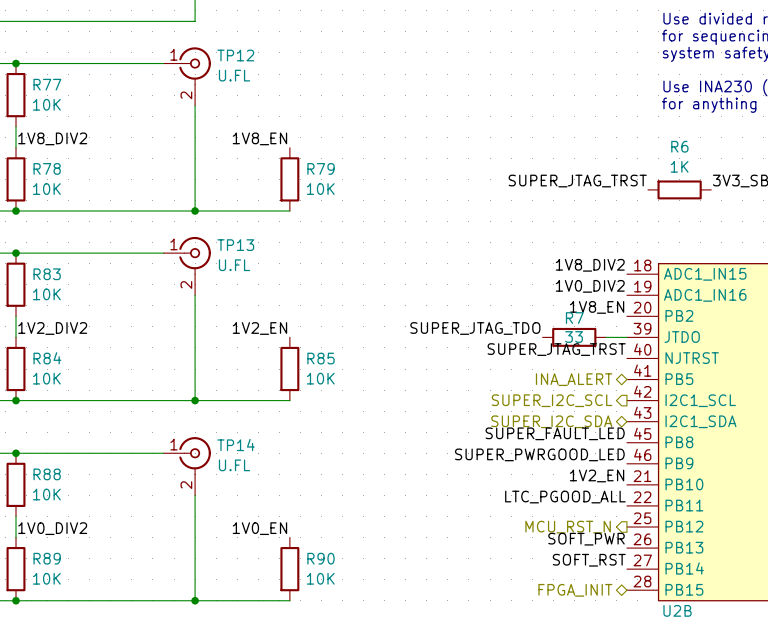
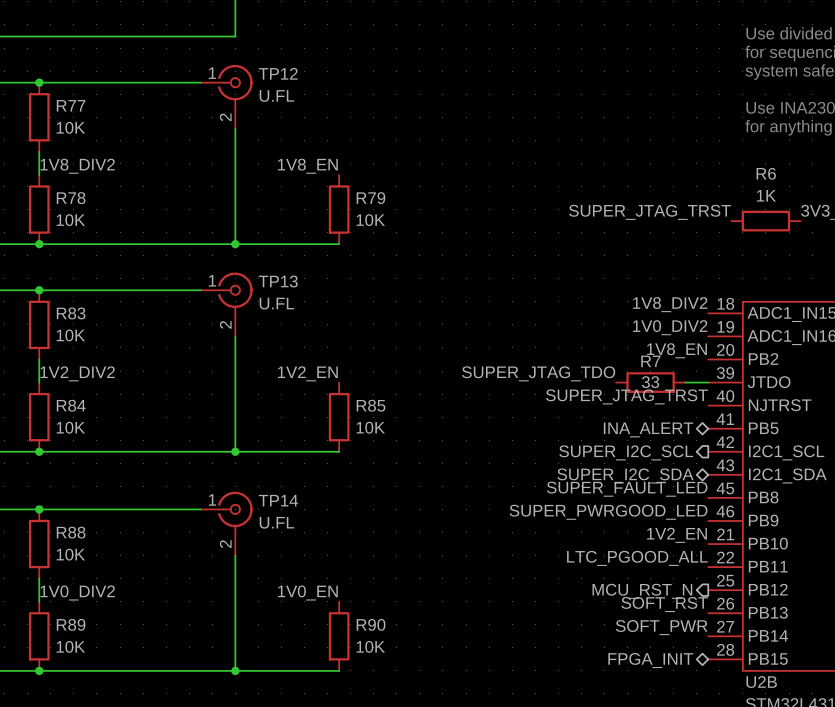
label: SOFT_PWR (586, 539) -> SOFT_RST (664, 604)
label: SOFT_RST (589, 560) -> SOFT_PWR (661, 627)

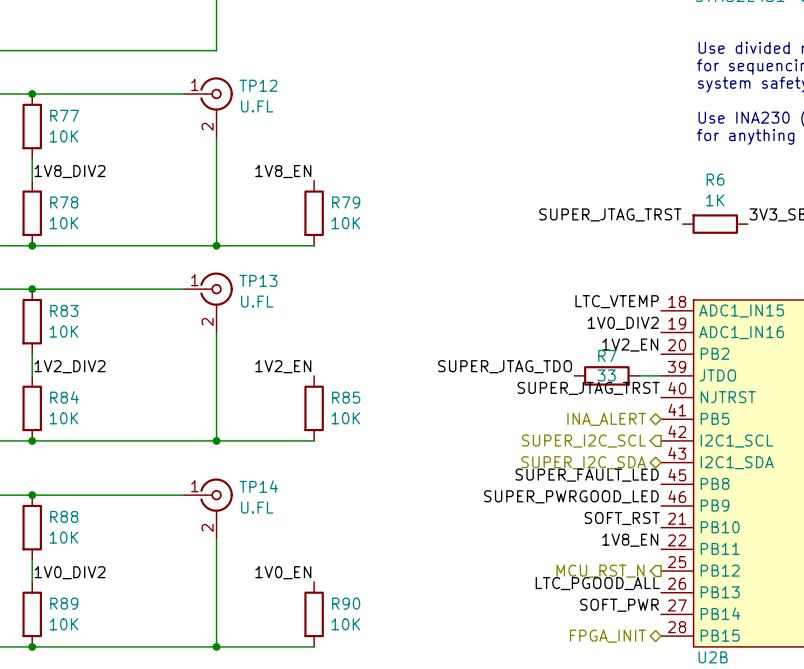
label: 1V8_DIV2 (670, 304) -> LTC_VTEMP (617, 301)
label: 1V8_EN (677, 350) -> 1V2_EN (630, 345)
label: 1V2_EN (677, 535) -> SOFT_RST (622, 518)
label: LTC_PGOOD_ALL (637, 558) -> 1V8_EN (630, 540)
label: SOFT_RST (664, 604) -> LTC_PGOOD_ALL (597, 583)

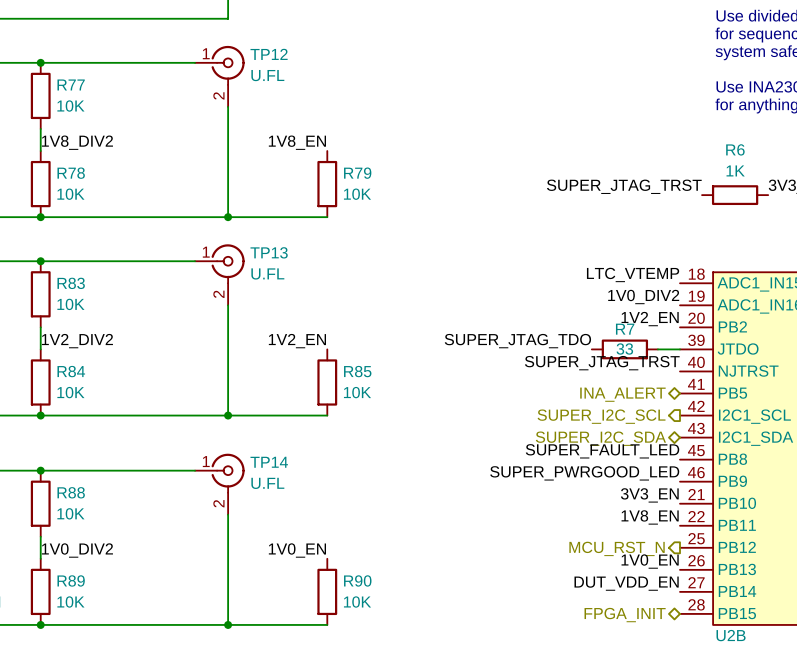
label: SOFT_RST (622, 518) -> 3V3_EN (649, 495)
label: LTC_PGOOD_ALL (597, 583) -> 1V0_EN (650, 561)
label: SOFT_PWR (619, 605) -> DUT_VDD_EN (626, 583)

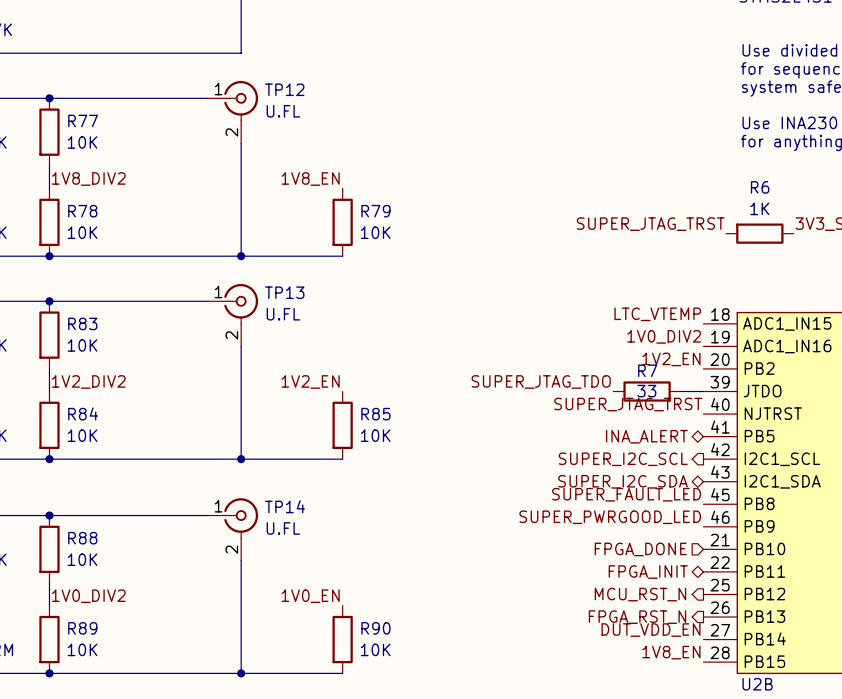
label: 3V3_EN (649, 495) -> none
hierarchical label: none -> FPGA_DONE (640, 549)
label position: 1V8_EN (650, 517) -> 1V8_EN (671, 652)
label: 1V0_EN (650, 561) -> none
hierarchical label: none -> FPGA_RST_N (637, 617)
hierarchical label position: FPGA_INIT (625, 615) -> FPGA_INIT (648, 572)

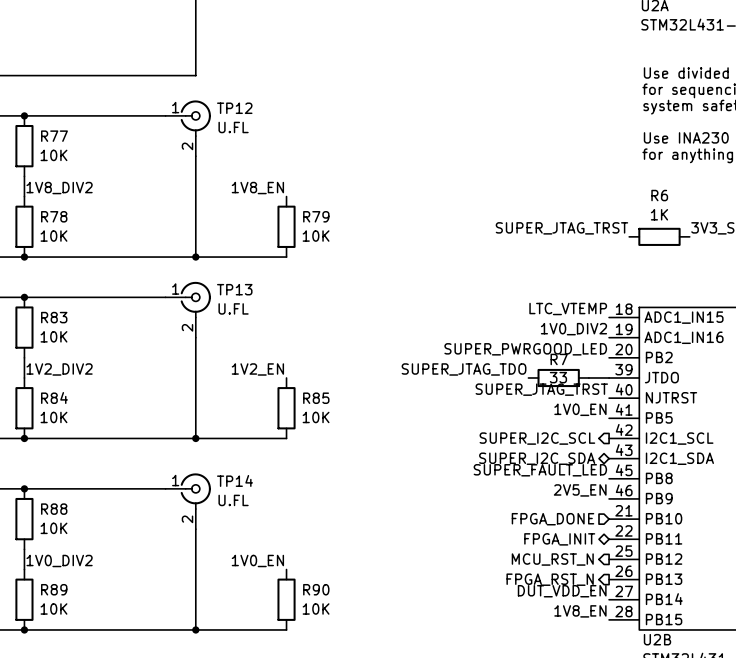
label: 1V2_EN (671, 359) -> SUPER_PWRGOOD_LED (525, 349)
label: none -> 1V0_EN (580, 409)
hierarchical label: INA_ALERT (646, 436) -> none
label: SUPER_PWRGOOD_LED (610, 517) -> 2V5_EN (580, 490)

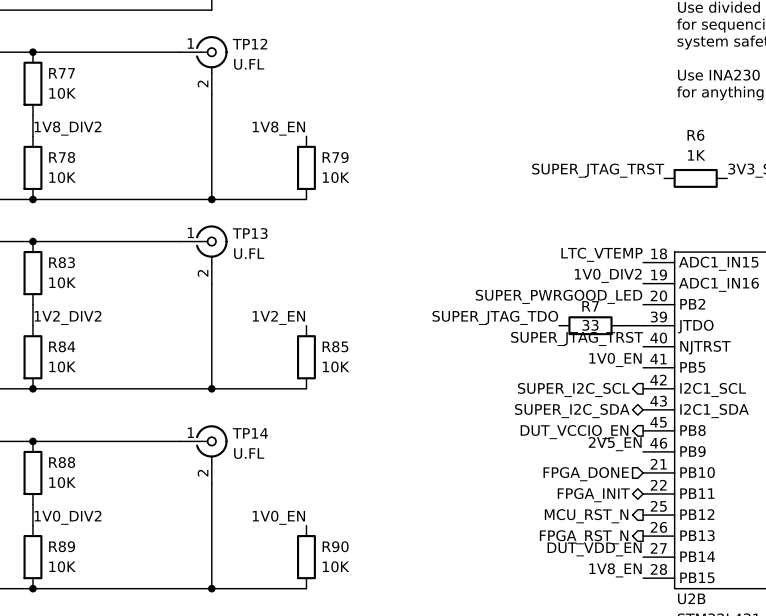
label: SUPER_FAULT_LED (540, 470) -> none
hierarchical label: none -> DUT_VCCIO_EN (574, 432)

